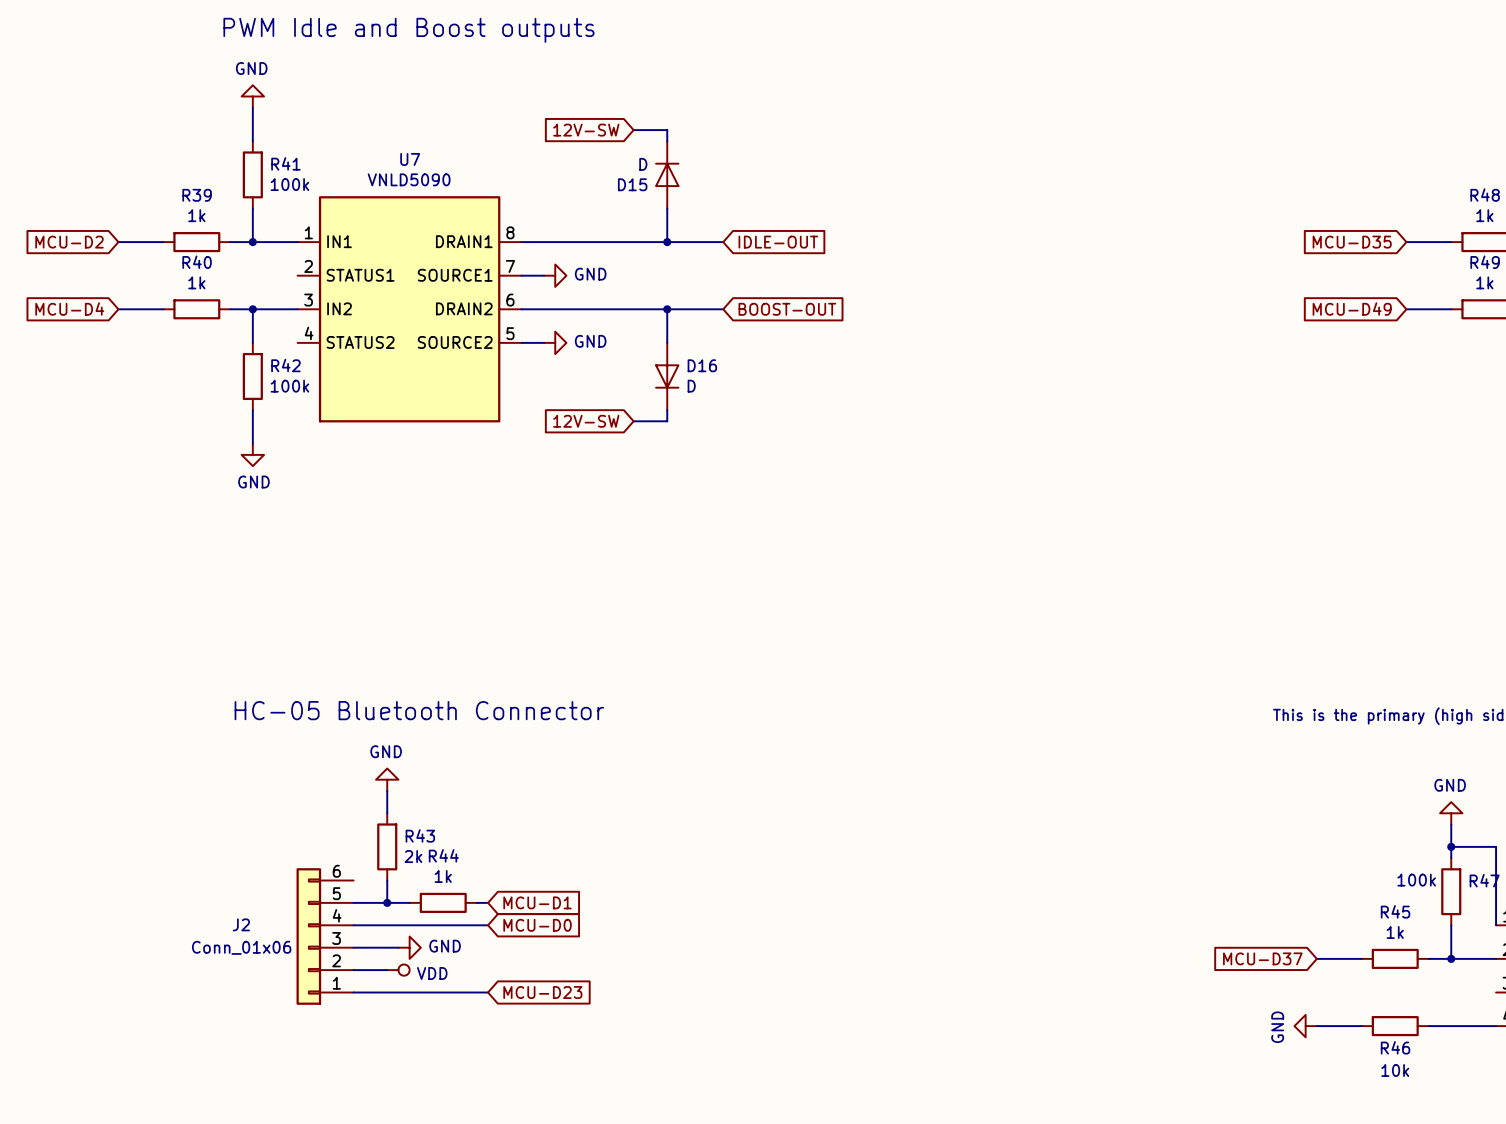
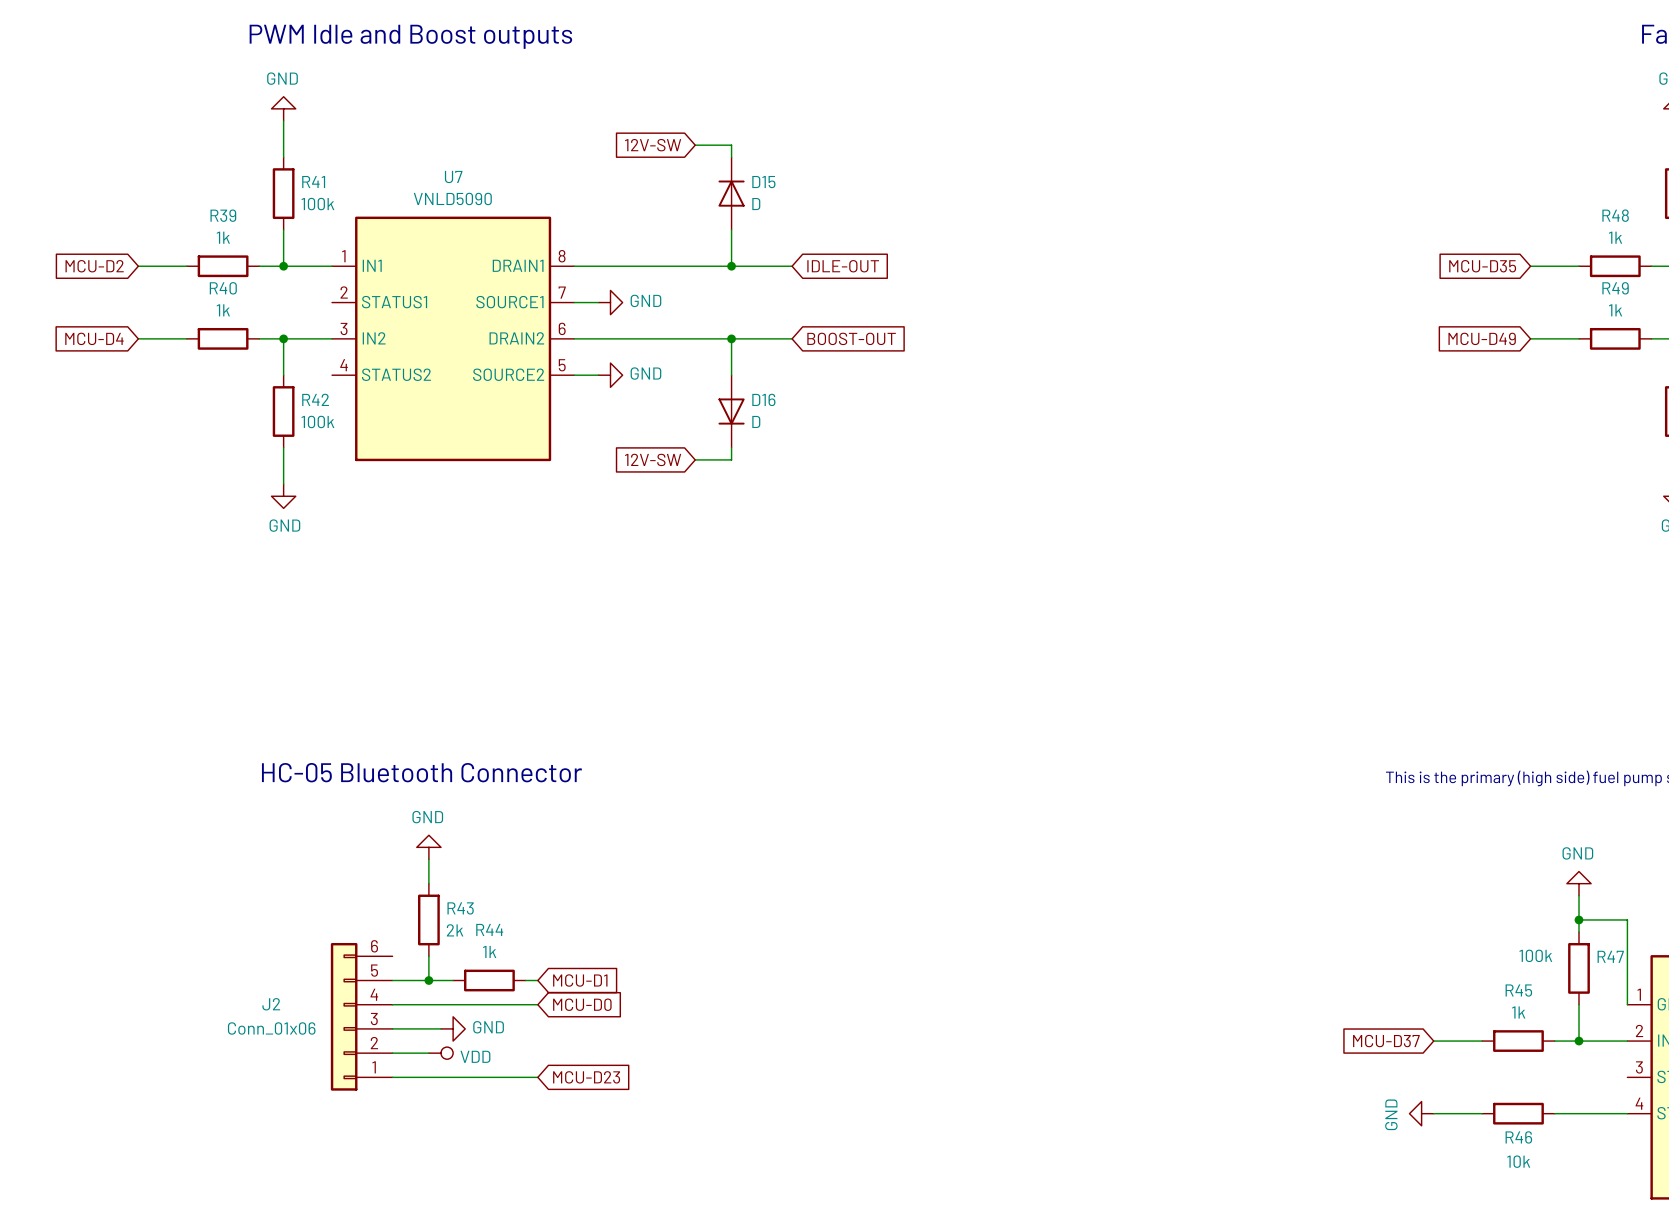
D15 value position: D (643, 164) -> D (756, 204)
D15 name position: D15 (632, 184) -> D15 (763, 182)

